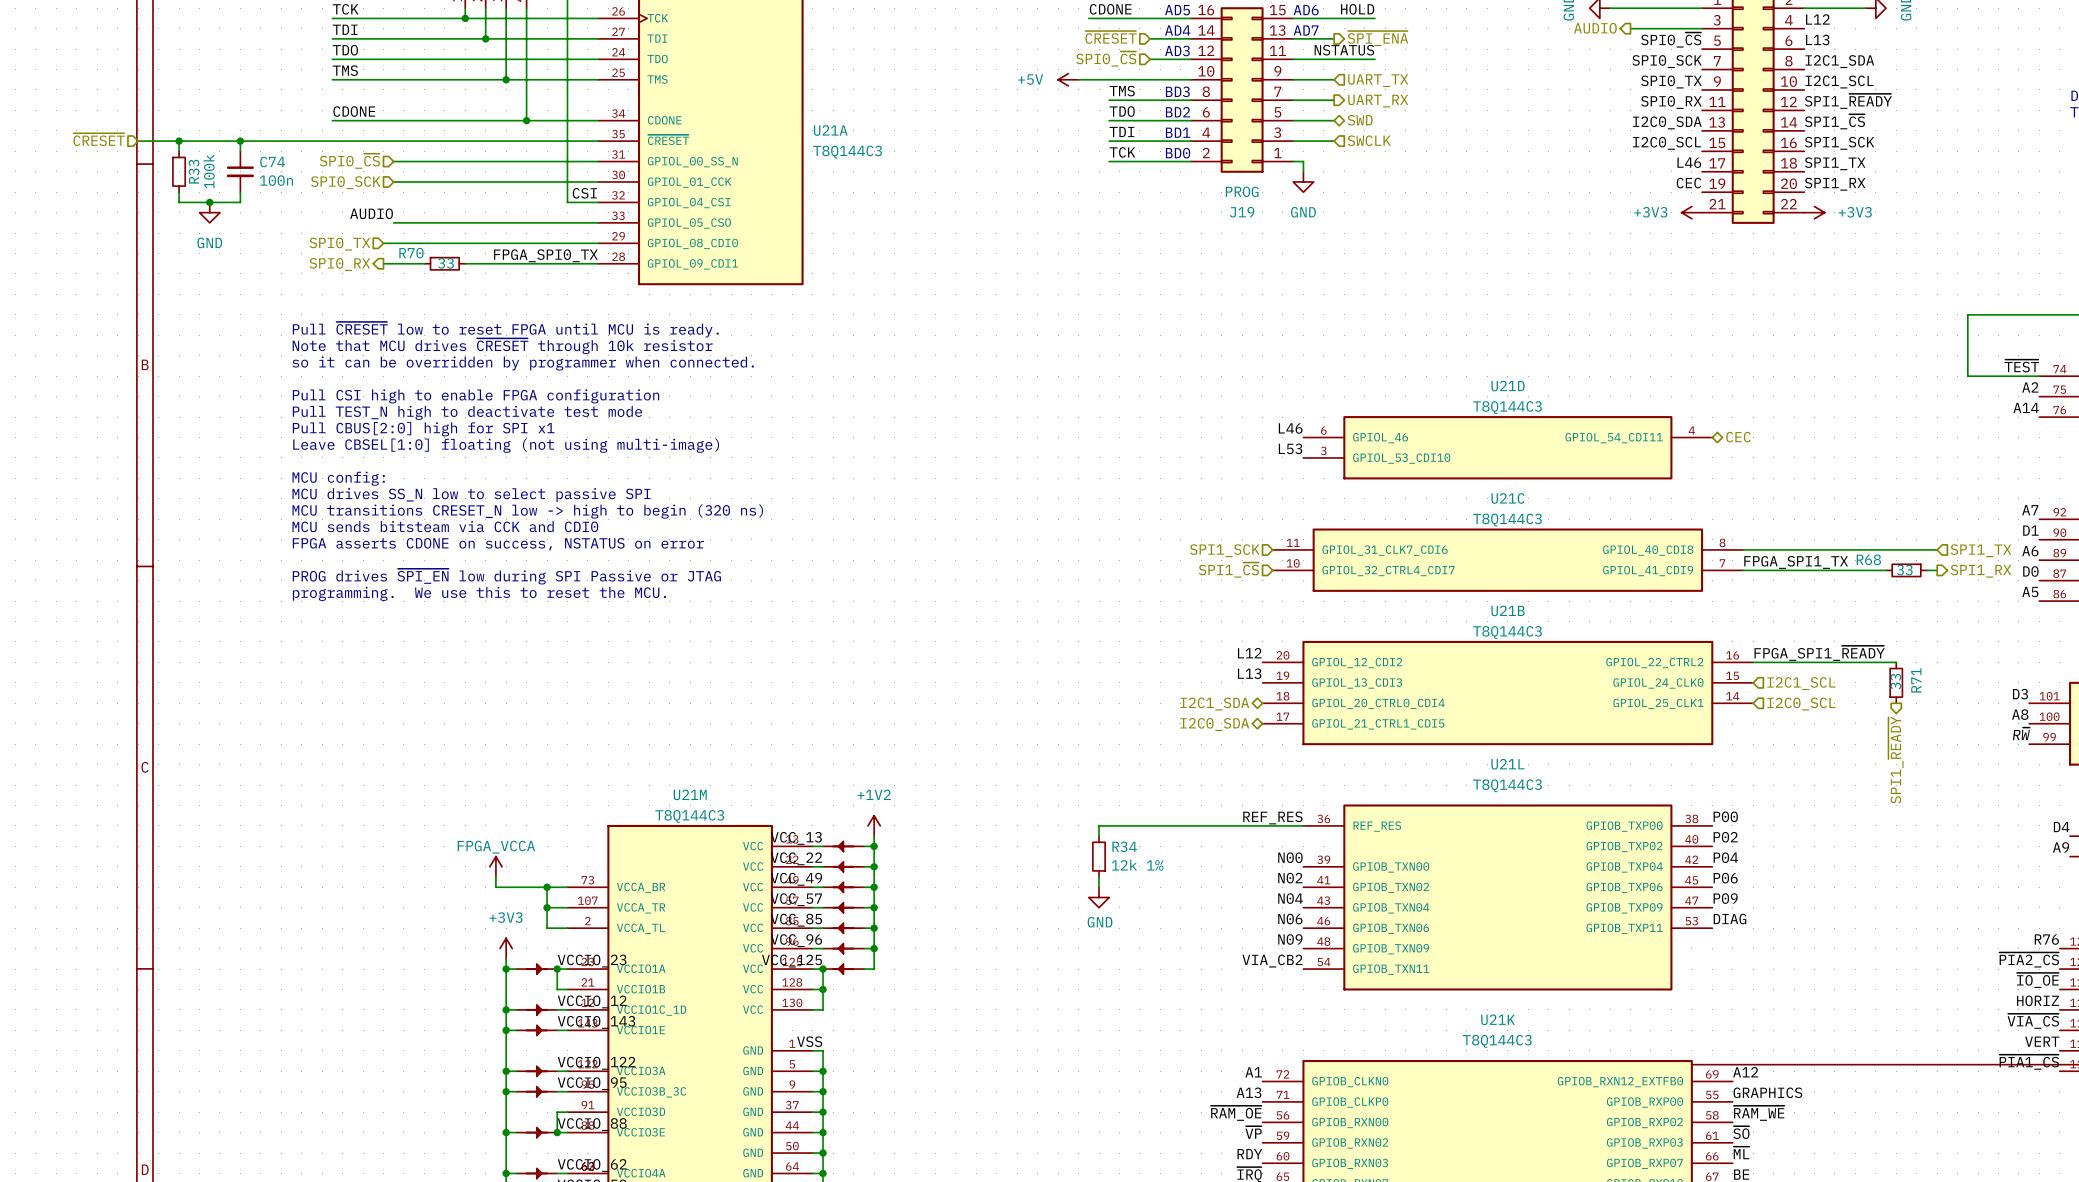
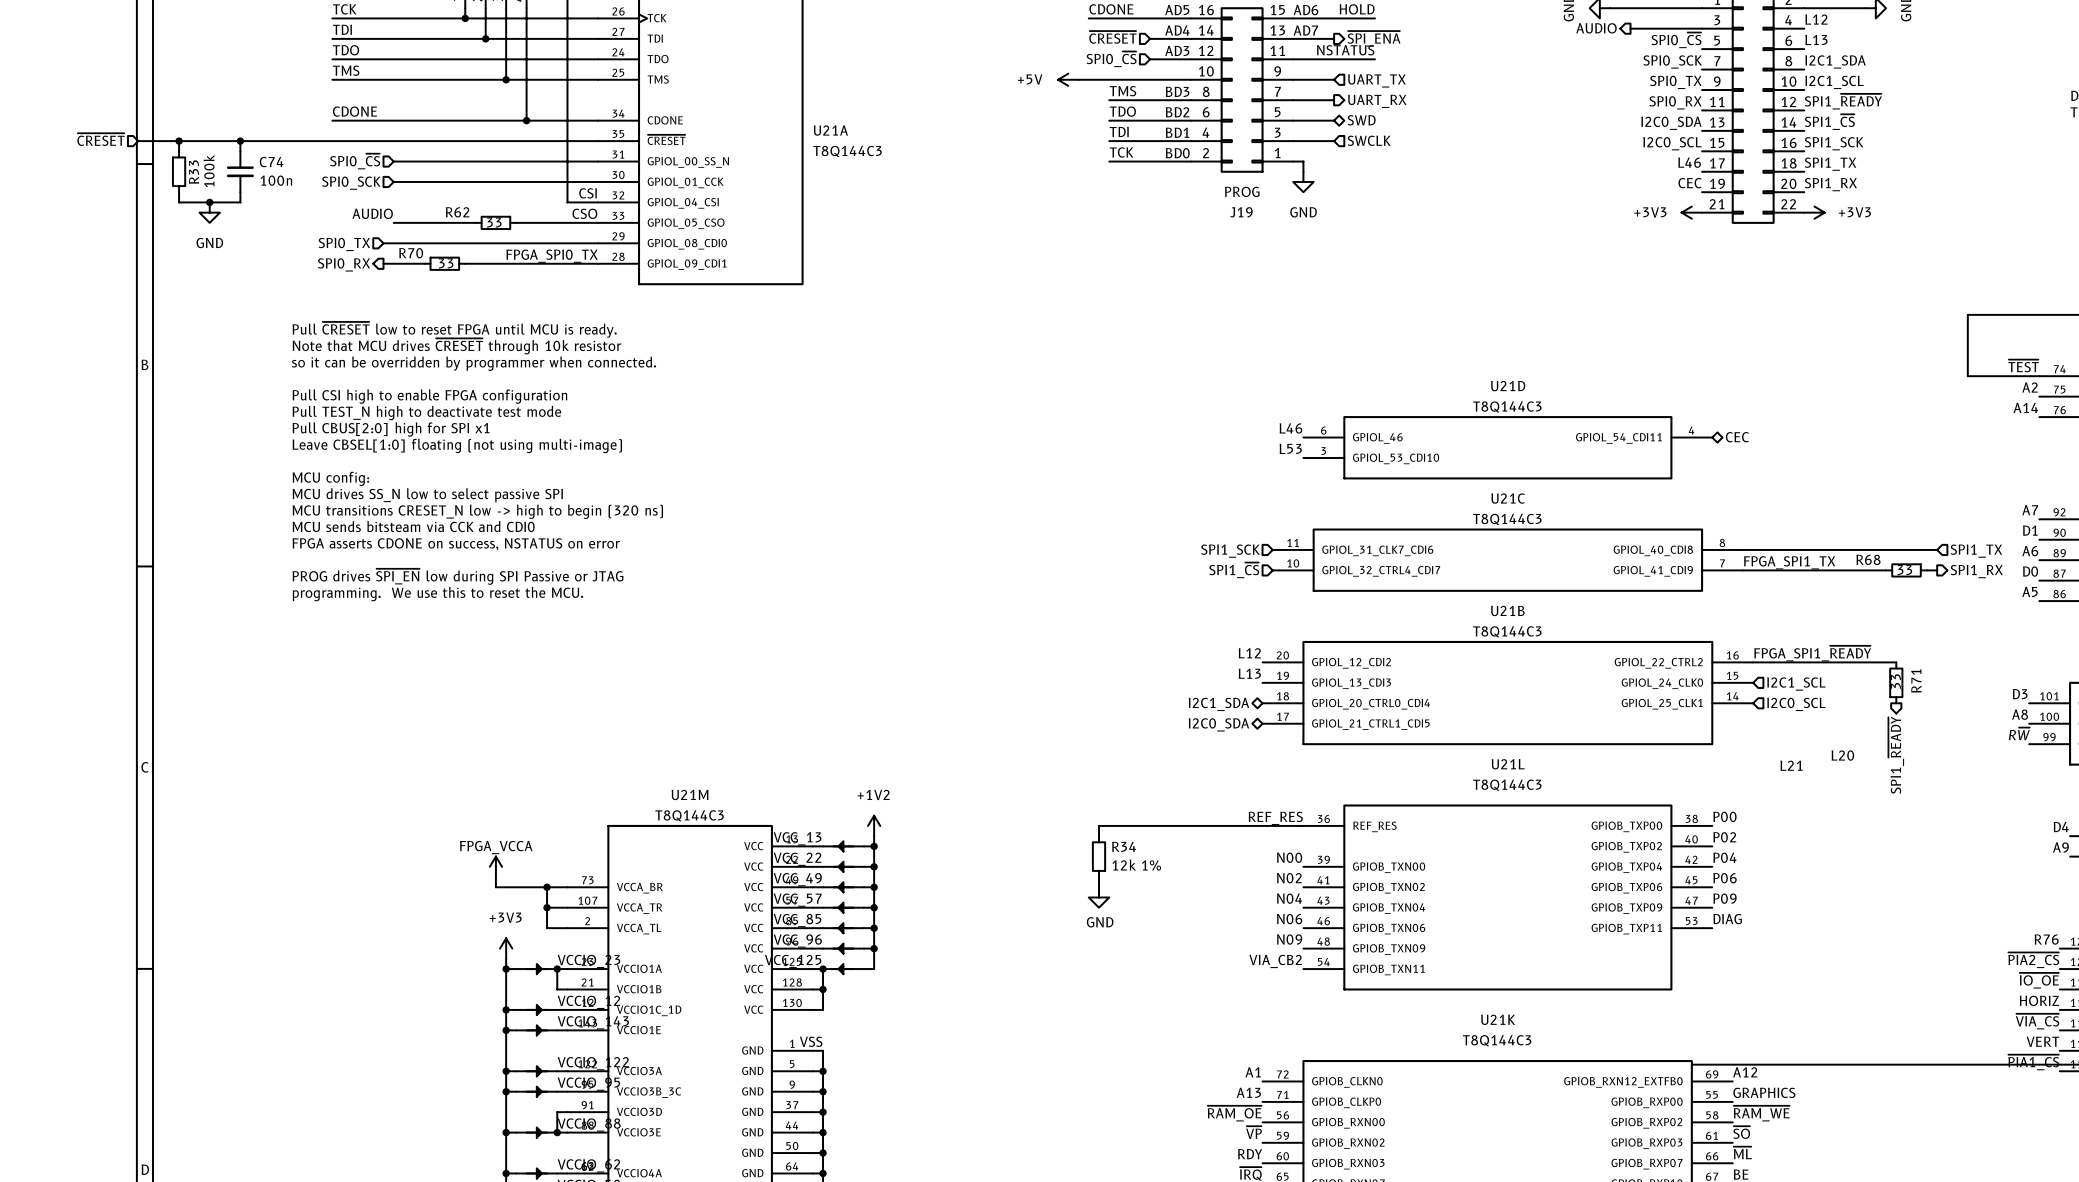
label: none -> CSO (584, 213)
wire: (475, 222) (516, 222) -> none
R62: none -> 33 (495, 222)
label: none -> L20 (1842, 755)
label: none -> L21 (1791, 765)

